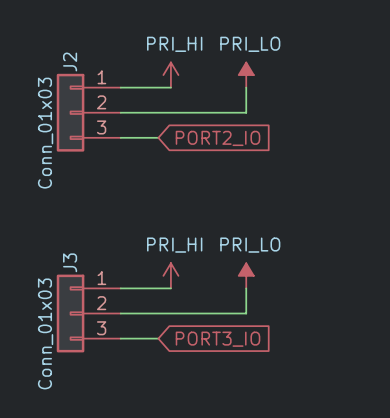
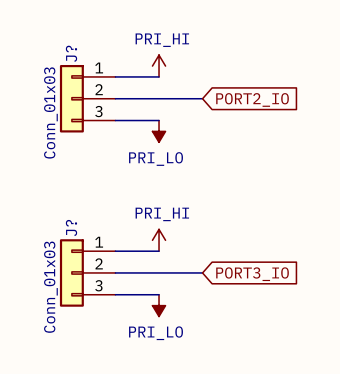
J2 name: J2 (70, 62) -> J? (71, 53)
power symbol: PRI_LO (246, 75) -> none
wire: (246, 87) (246, 112) (221, 112) -> none
wire: none -> (148, 120) (159, 120)
global label position: PORT2_IO (218, 138) -> PORT2_IO (252, 99)
power symbol: none -> PRI_LO (159, 131)
J3 name: J3 (70, 262) -> J? (71, 228)
power symbol: PRI_LO (246, 275) -> none
wire: (246, 288) (246, 313) (221, 313) -> none
wire: none -> (148, 294) (159, 294)
global label position: PORT3_IO (218, 339) -> PORT3_IO (252, 274)
power symbol: none -> PRI_LO (159, 305)

